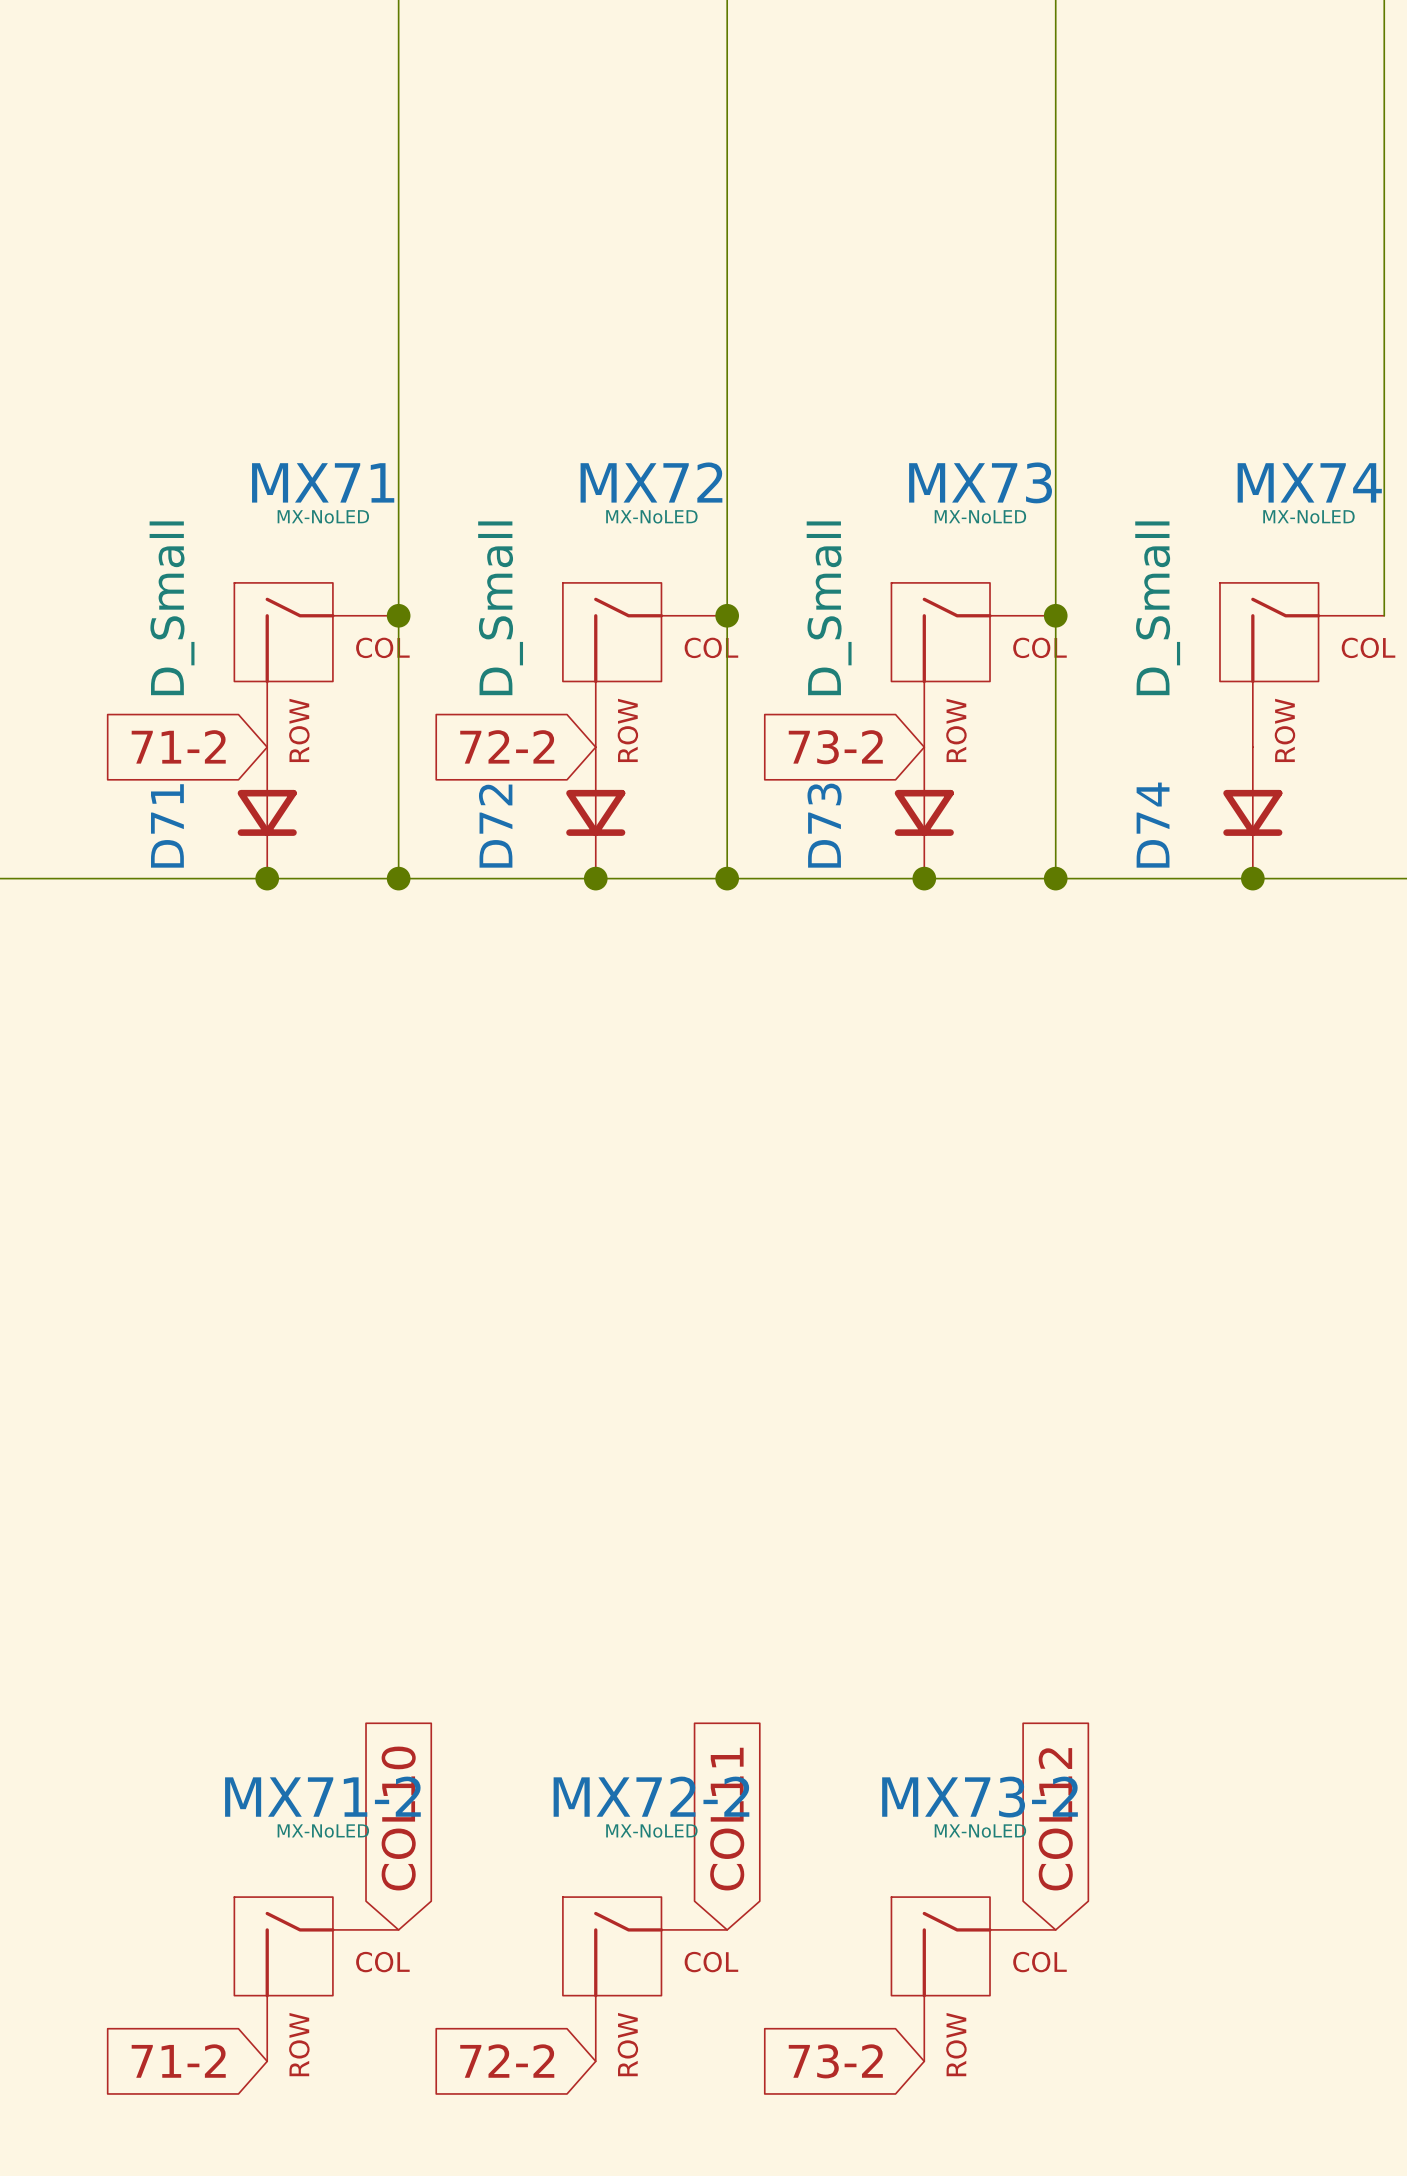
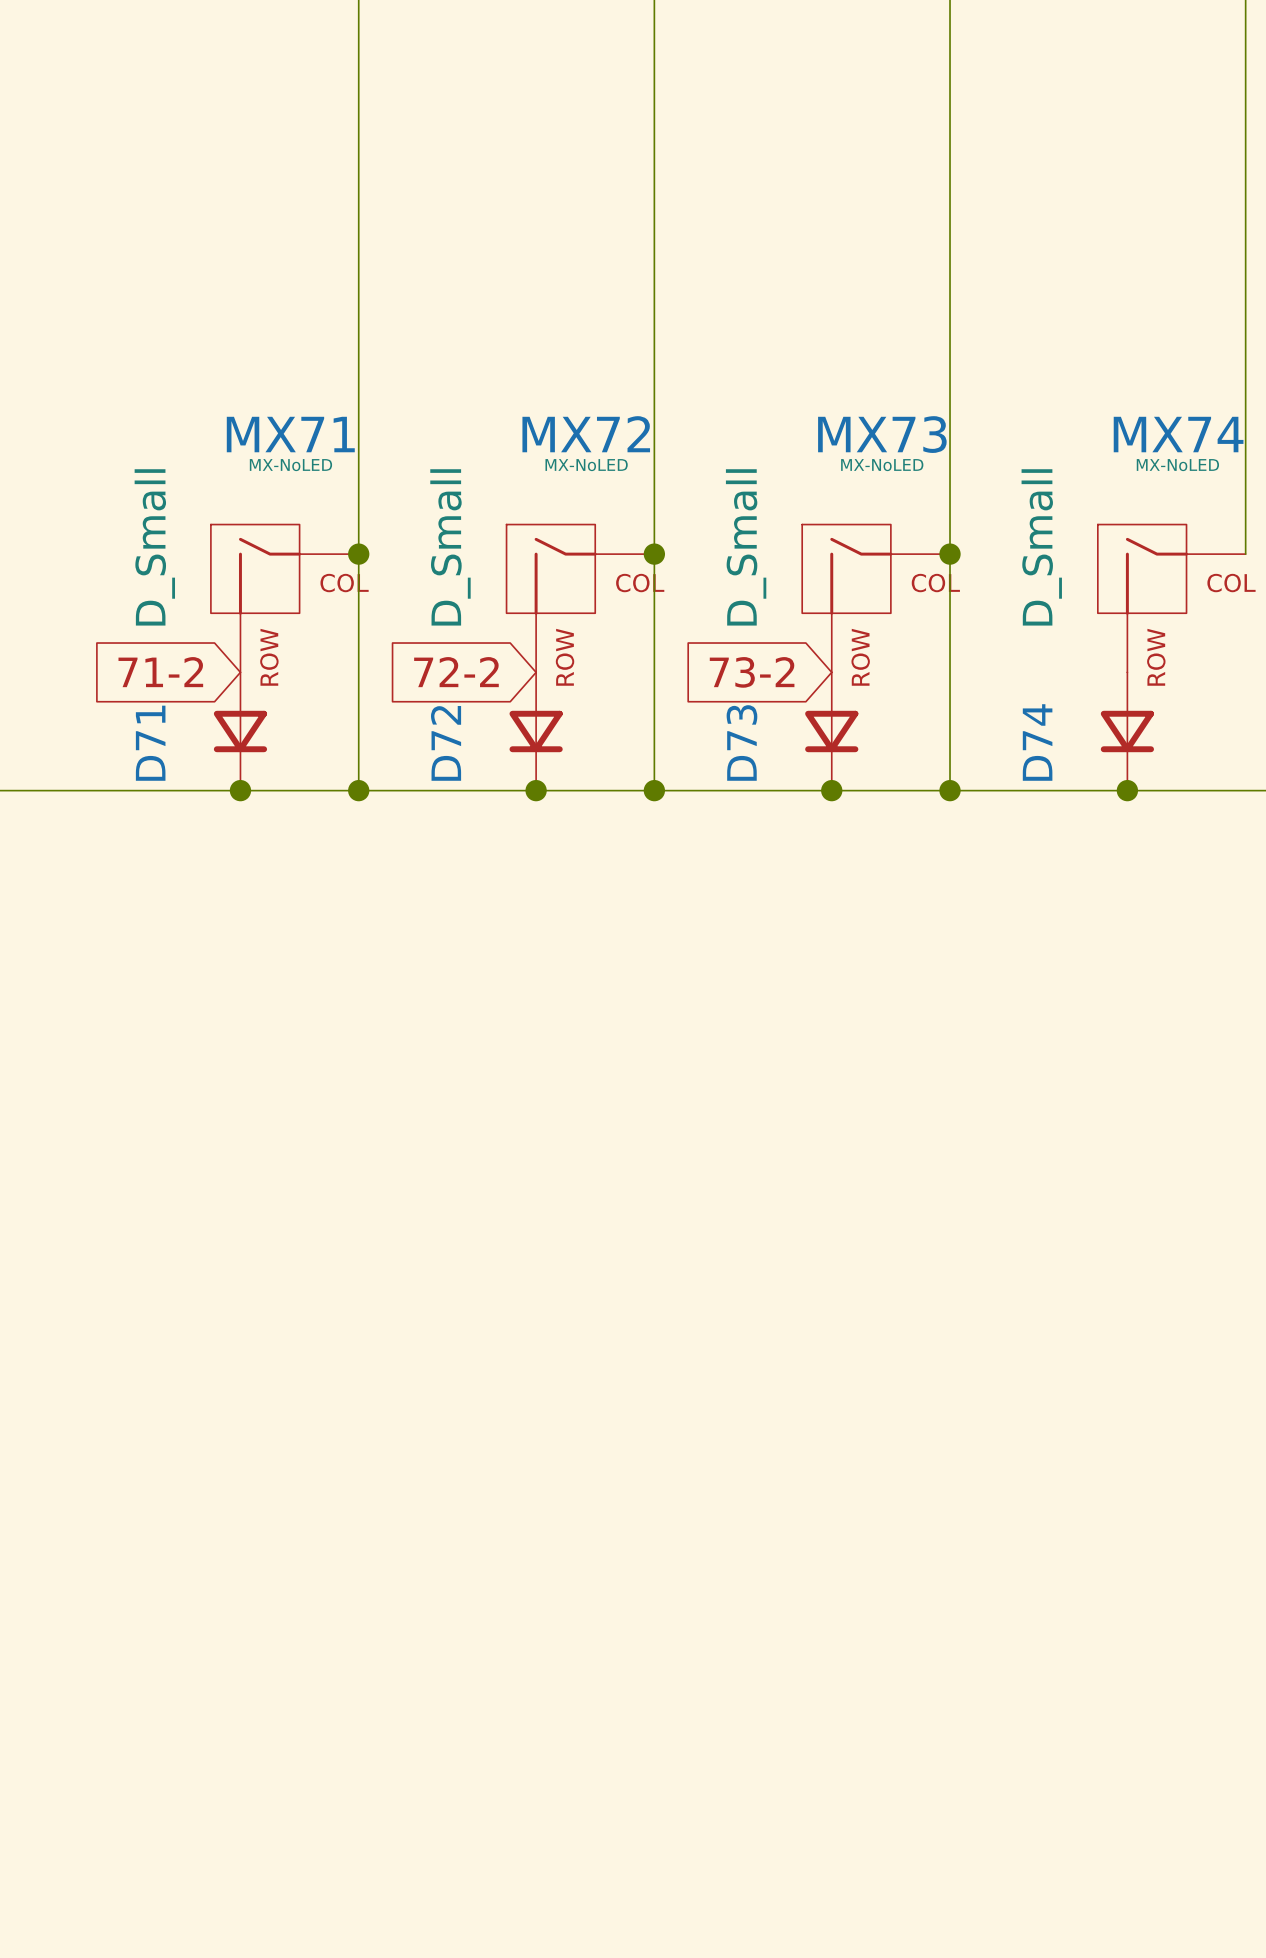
global label: COL10 (398, 1818) -> none
global label: COL11 (727, 1819) -> none
global label: COL12 (1055, 1819) -> none
MX71-2: MX-NoLED (316, 1979) -> none
MX72-2: MX-NoLED (645, 1979) -> none
MX73-2: MX-NoLED (973, 1979) -> none
global label: 71-2 (178, 2061) -> none
global label: 72-2 (507, 2061) -> none
global label: 73-2 (835, 2061) -> none

